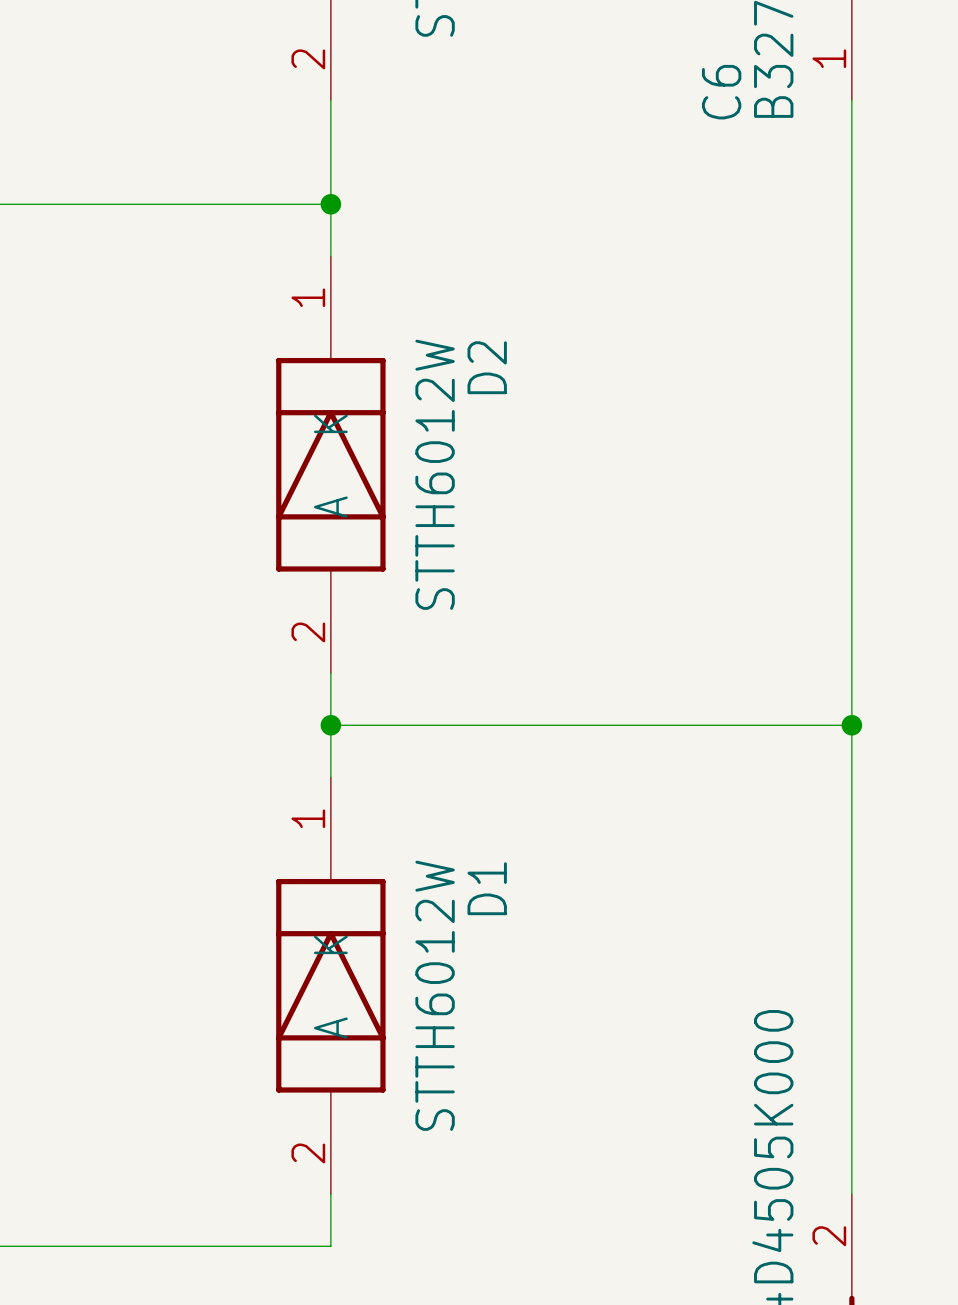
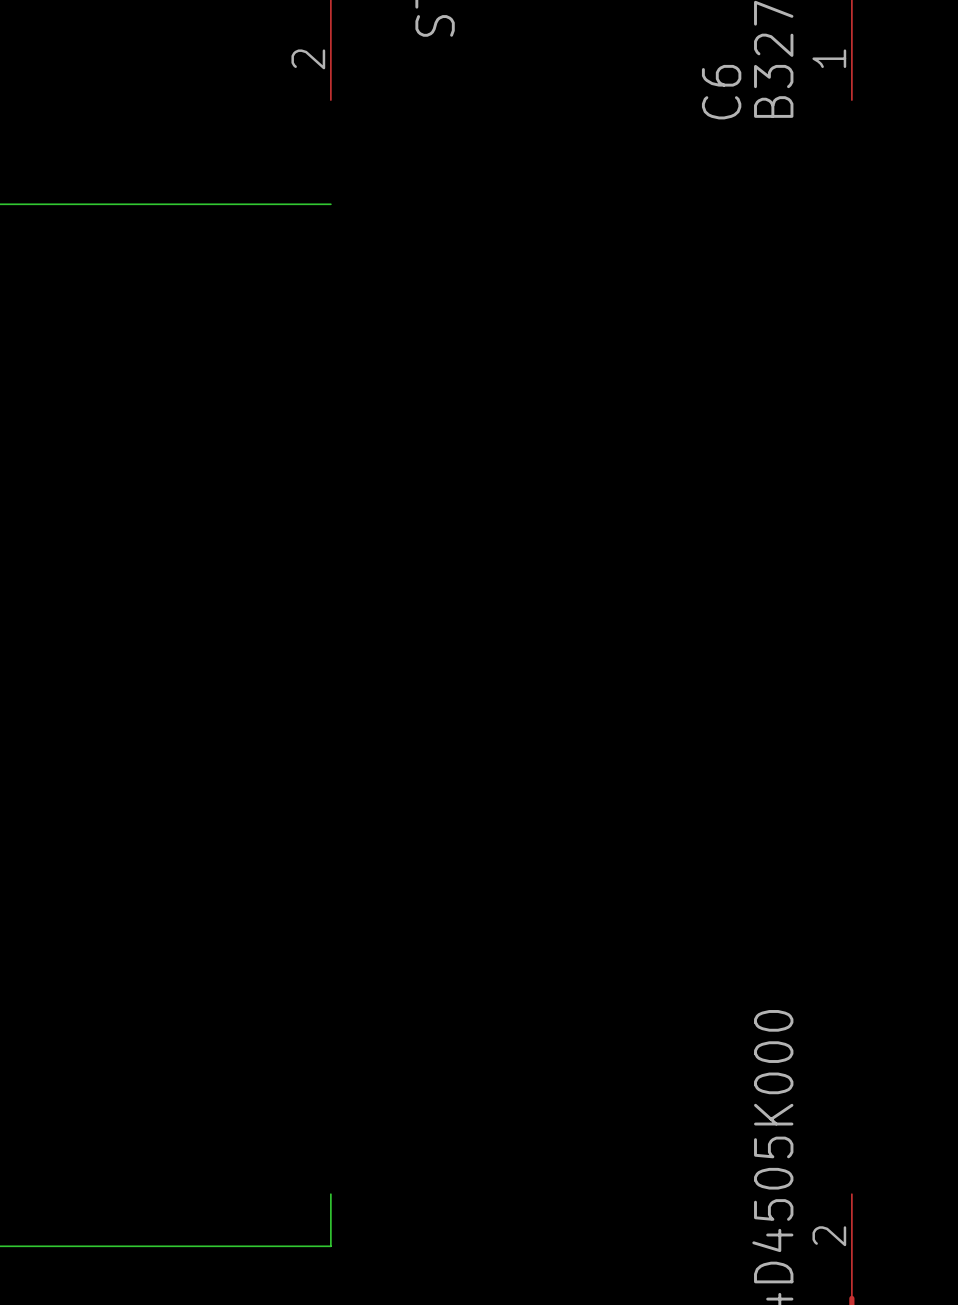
wire: (330, 100) (330, 256) -> none
wire: (851, 100) (851, 1194) -> none
junction: (330, 204) -> none
D2: STTH6012W (330, 464) -> none
wire: (330, 673) (330, 777) -> none
wire: (330, 725) (851, 725) -> none
junction: (330, 725) -> none
junction: (851, 725) -> none
D1: STTH6012W (330, 985) -> none

